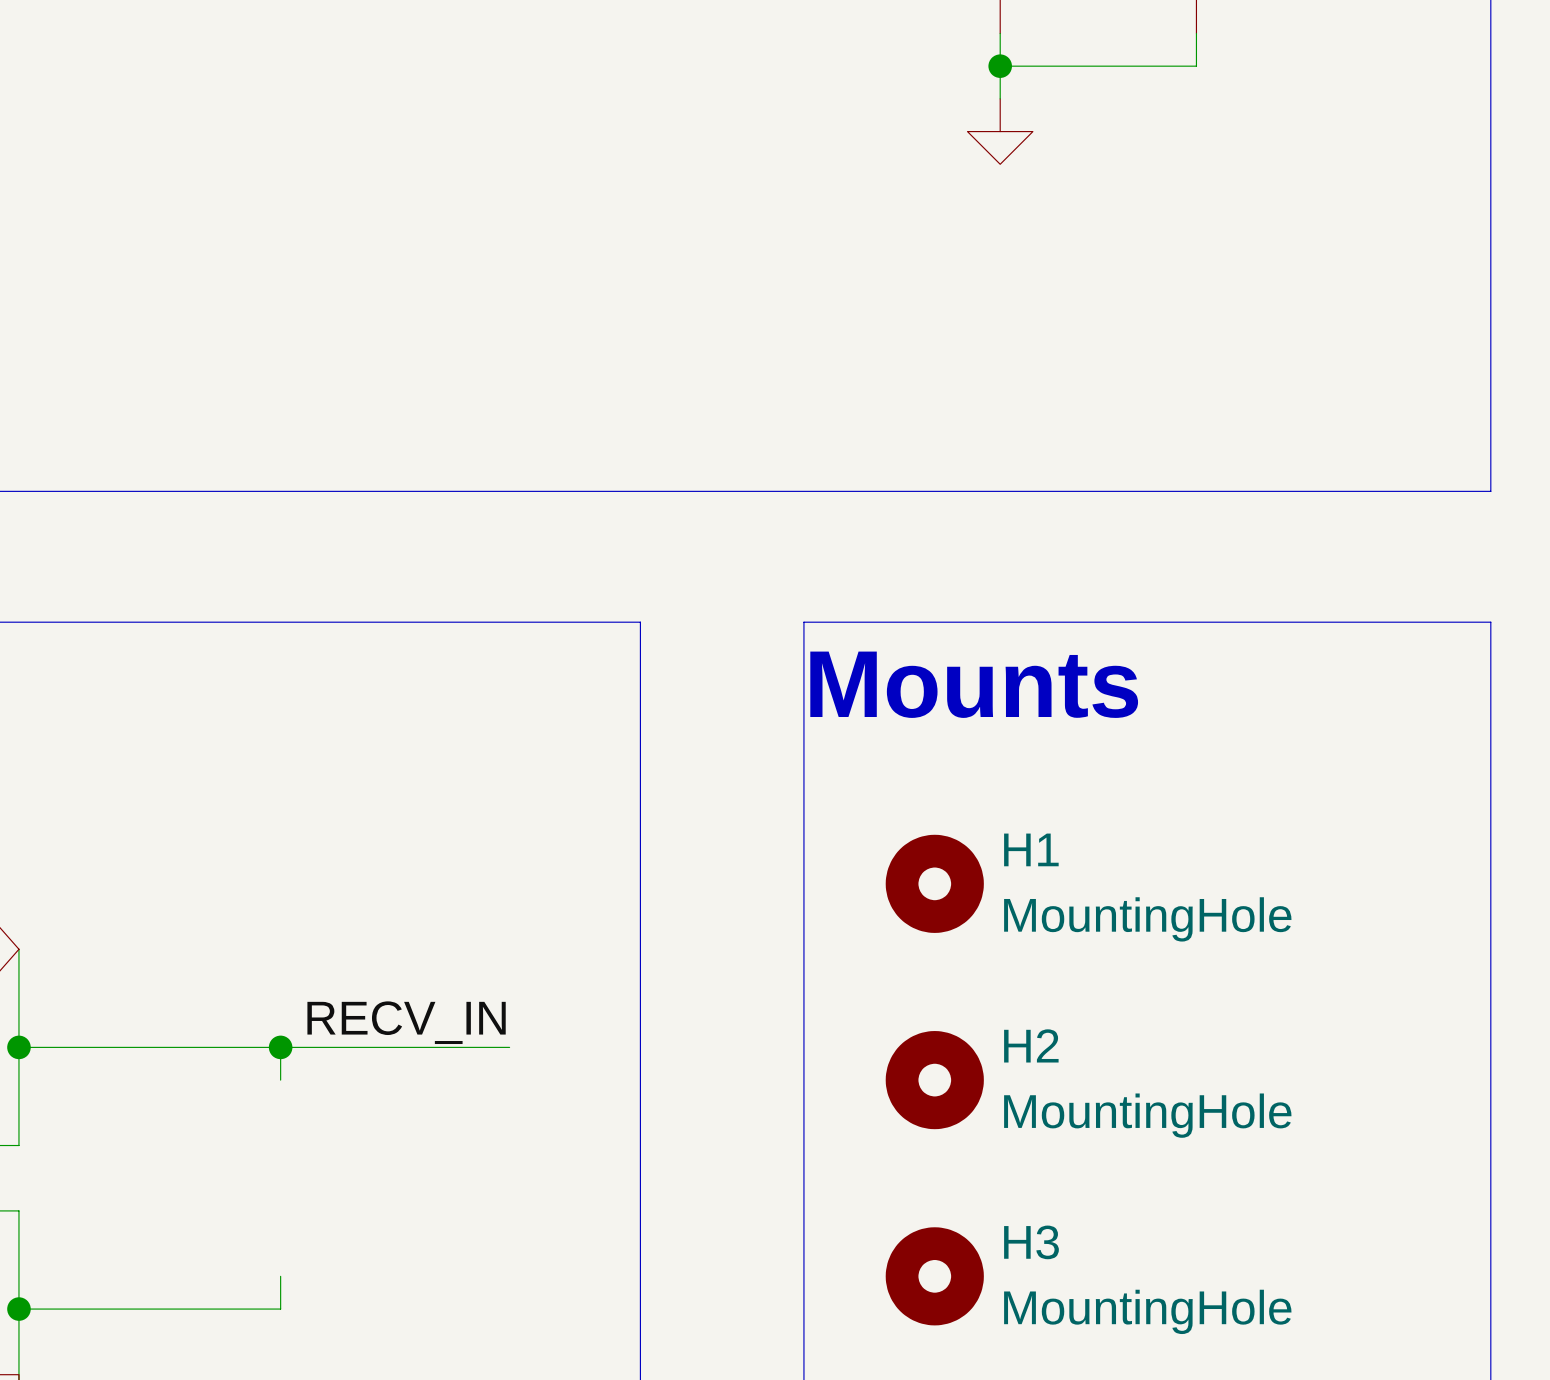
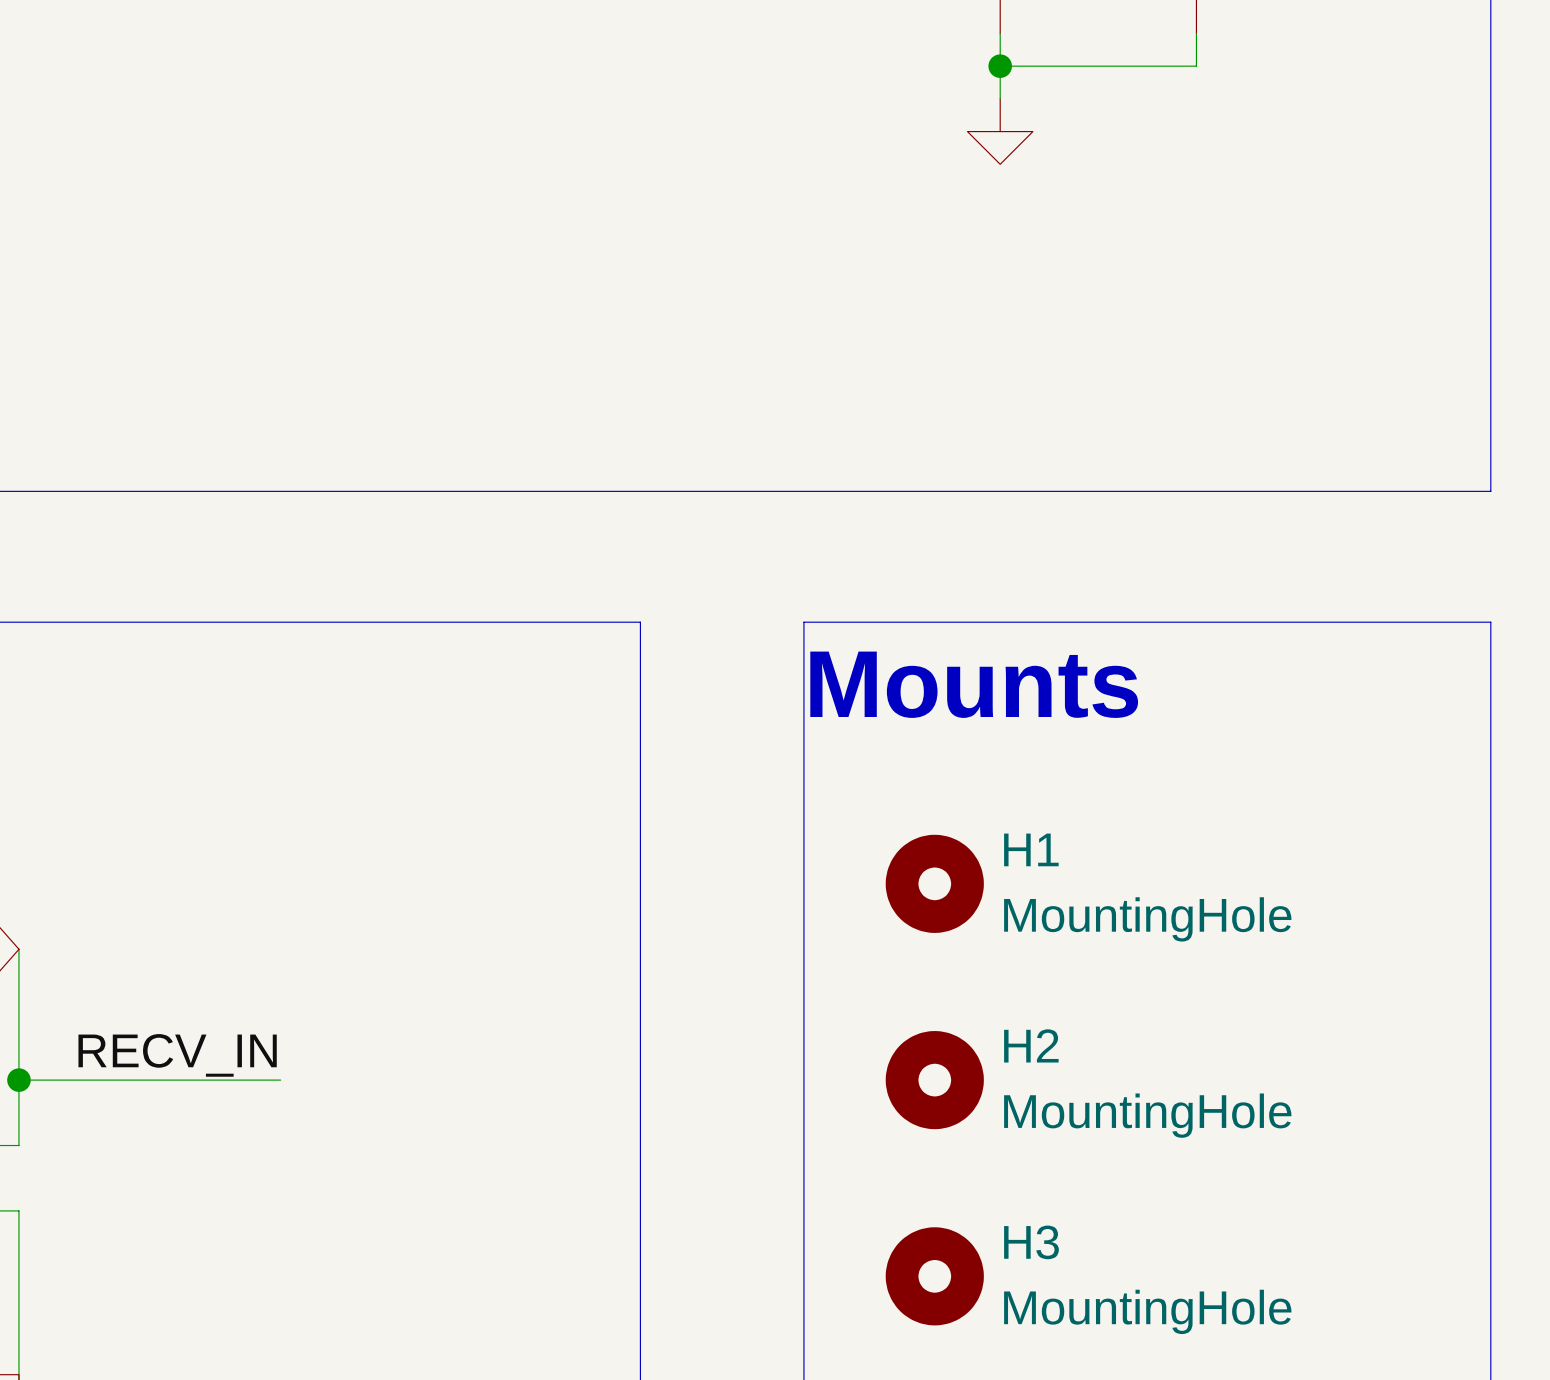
label position: RECV_IN (406, 1022) -> RECV_IN (177, 1055)
wire: (18, 1047) (509, 1047) -> none
junction position: (18, 1047) -> (18, 1080)
wire: (280, 1047) (280, 1080) -> (18, 1080) (280, 1080)
junction: (280, 1047) -> none
wire: (280, 1276) (280, 1309) (18, 1309) -> none
junction: (18, 1309) -> none

